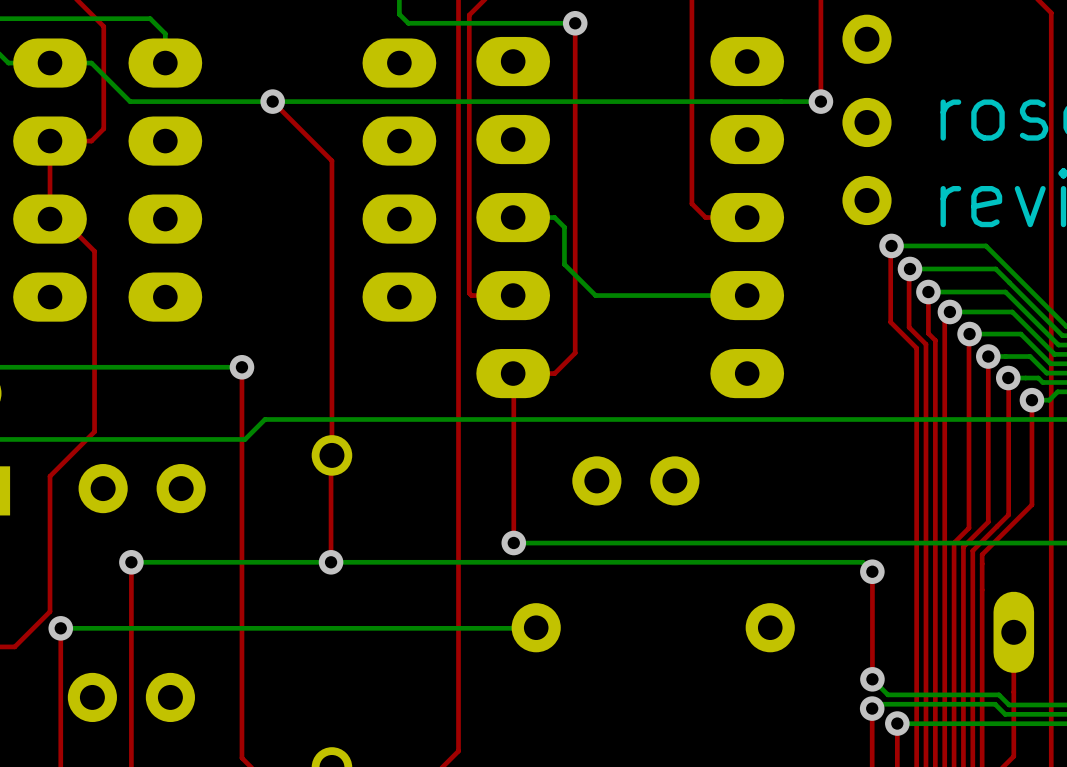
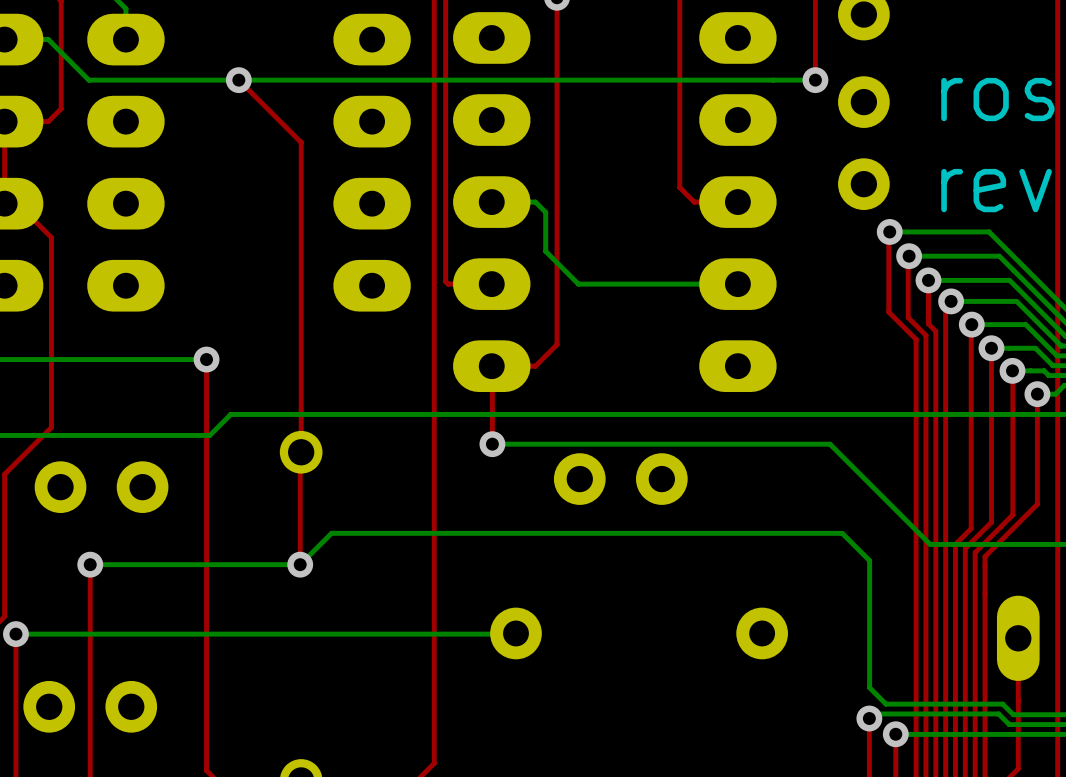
top track: (513, 447) (513, 542) -> none
via position: (513, 542) -> (492, 444)
bottom track: (930, 543) (513, 543) -> (930, 544) (829, 444) (492, 444)
bottom track: (331, 562) (862, 562) (872, 571) (869, 571) -> (300, 564) (331, 533) (842, 533) (869, 560) (869, 687)
top track: (872, 571) (872, 679) -> none
via: (872, 571) -> none
via: (872, 679) -> none

